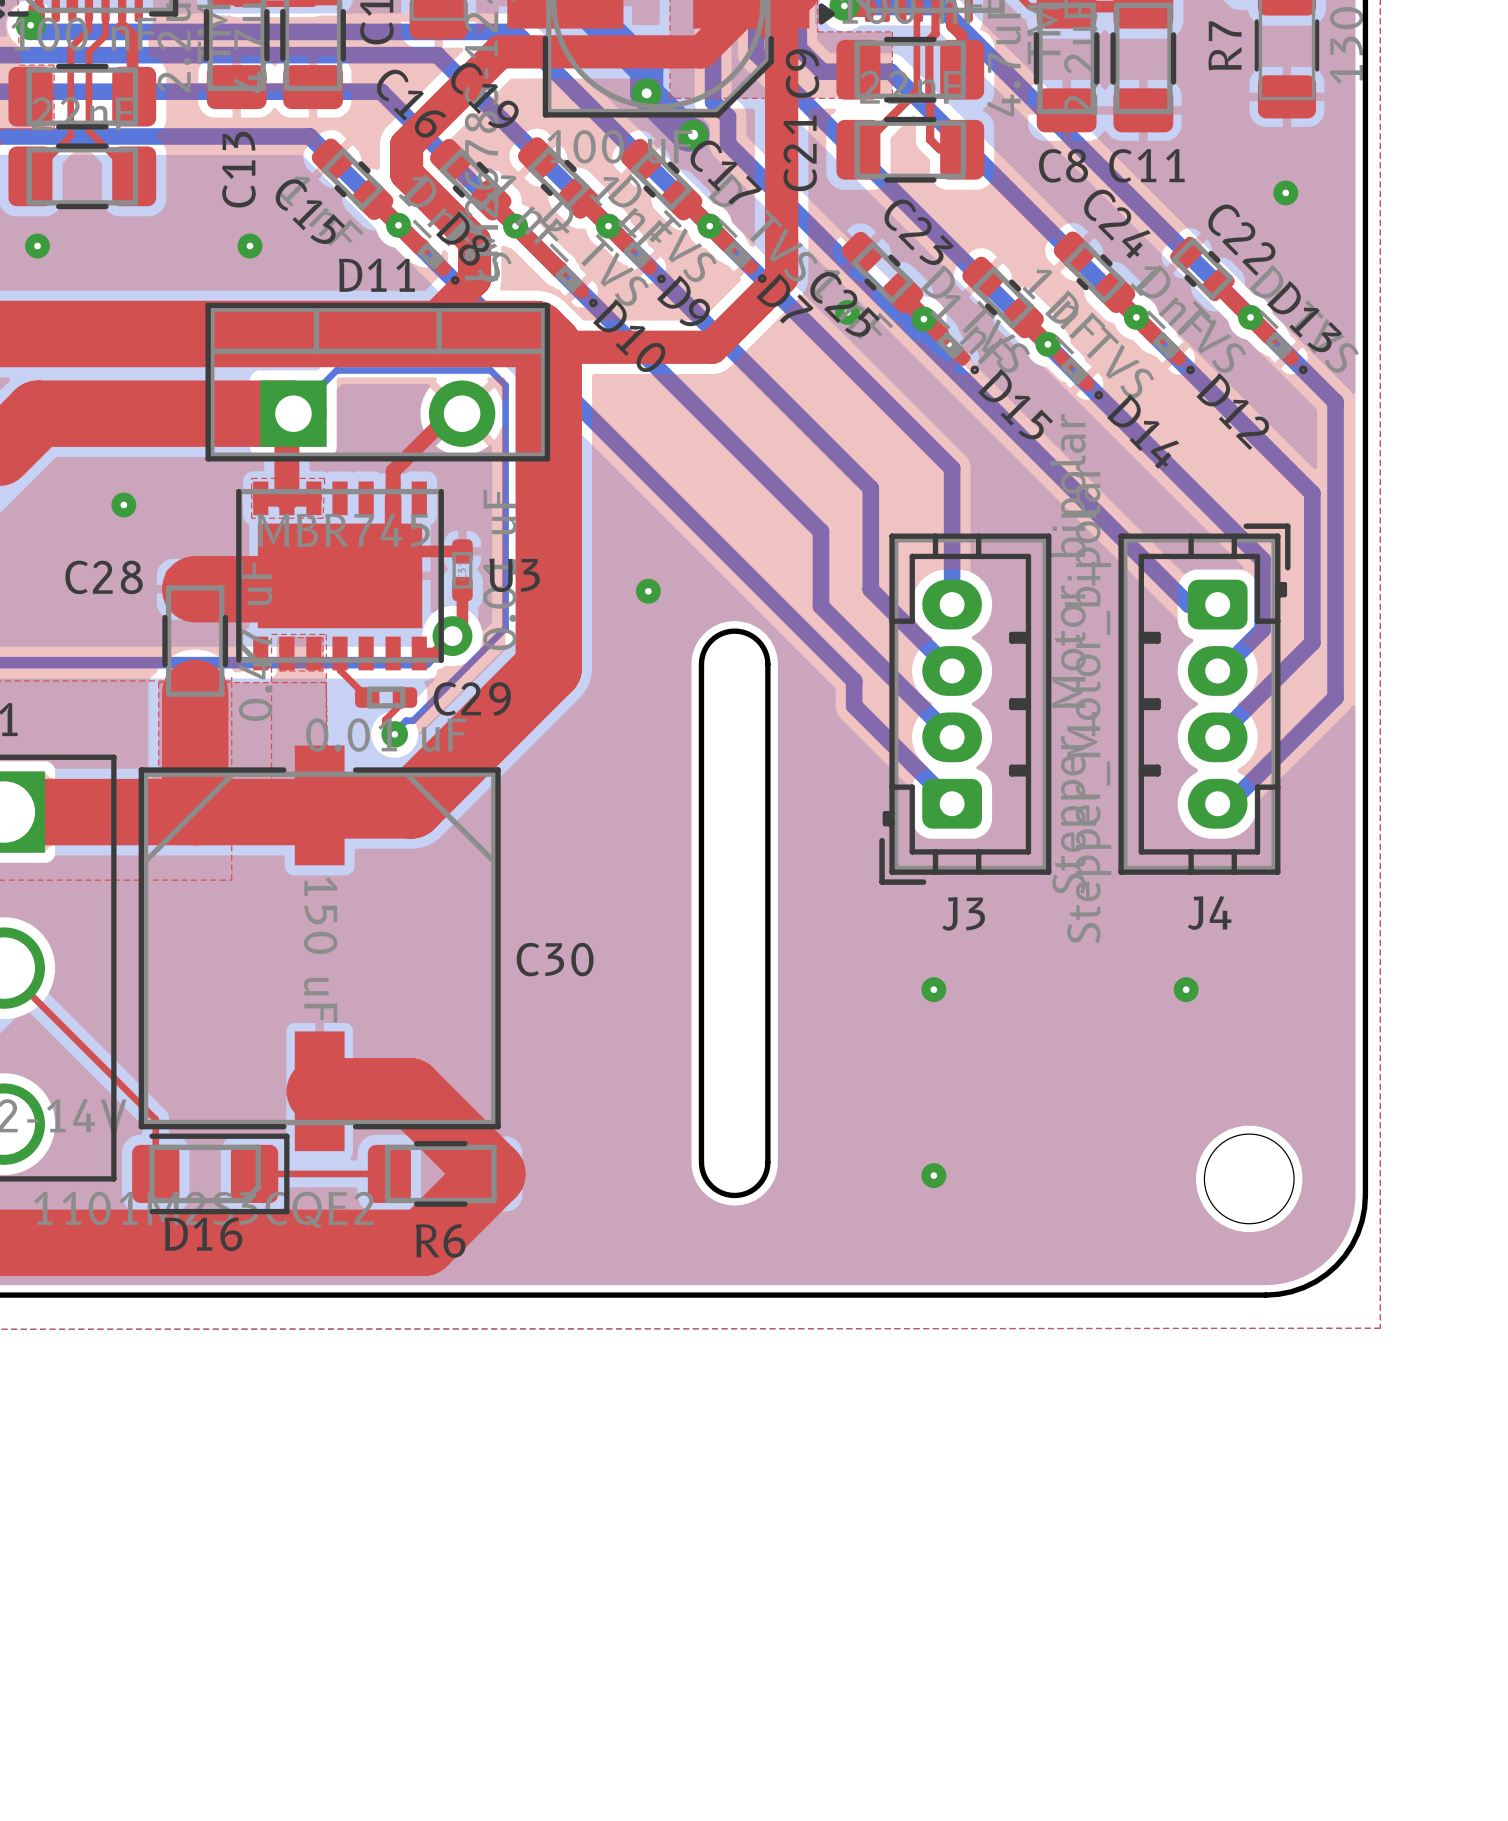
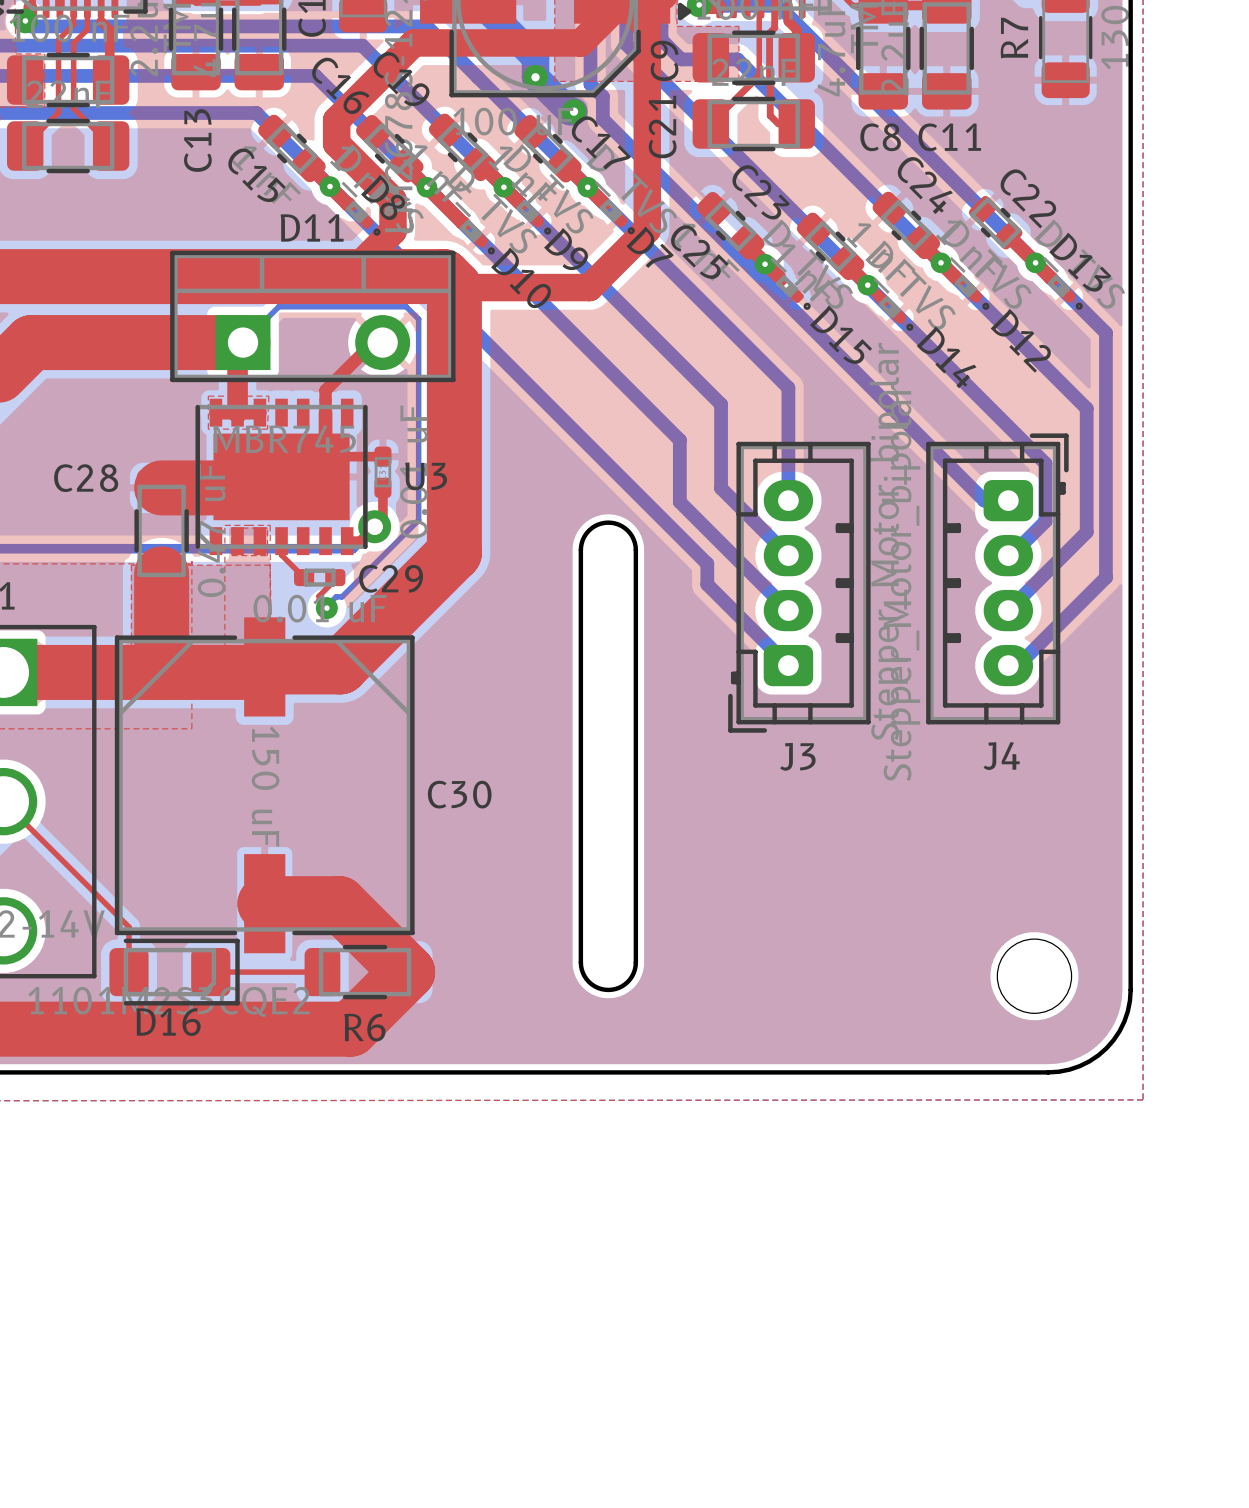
via: (1285, 192) -> none
via: (37, 246) -> none
via: (249, 246) -> none
via: (847, 312) -> none
via: (123, 504) -> none
via: (648, 591) -> none
via: (933, 989) -> none
via: (1186, 989) -> none
via: (933, 1175) -> none

